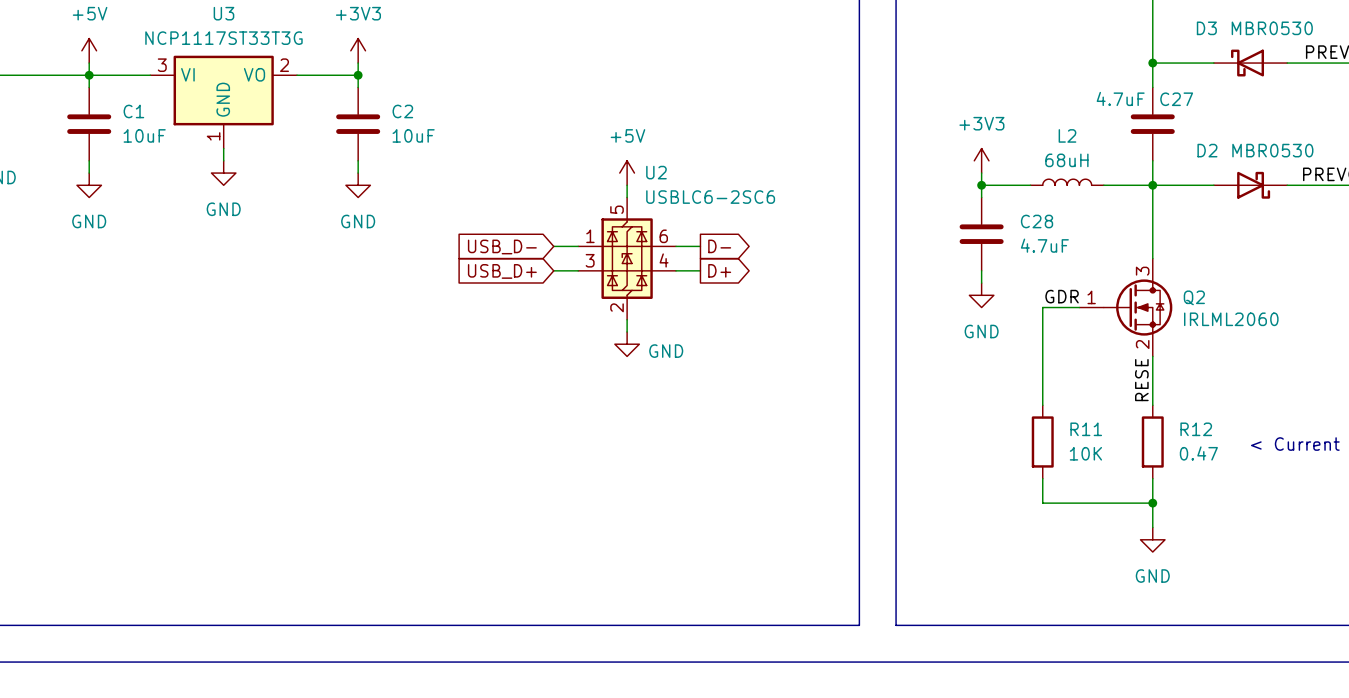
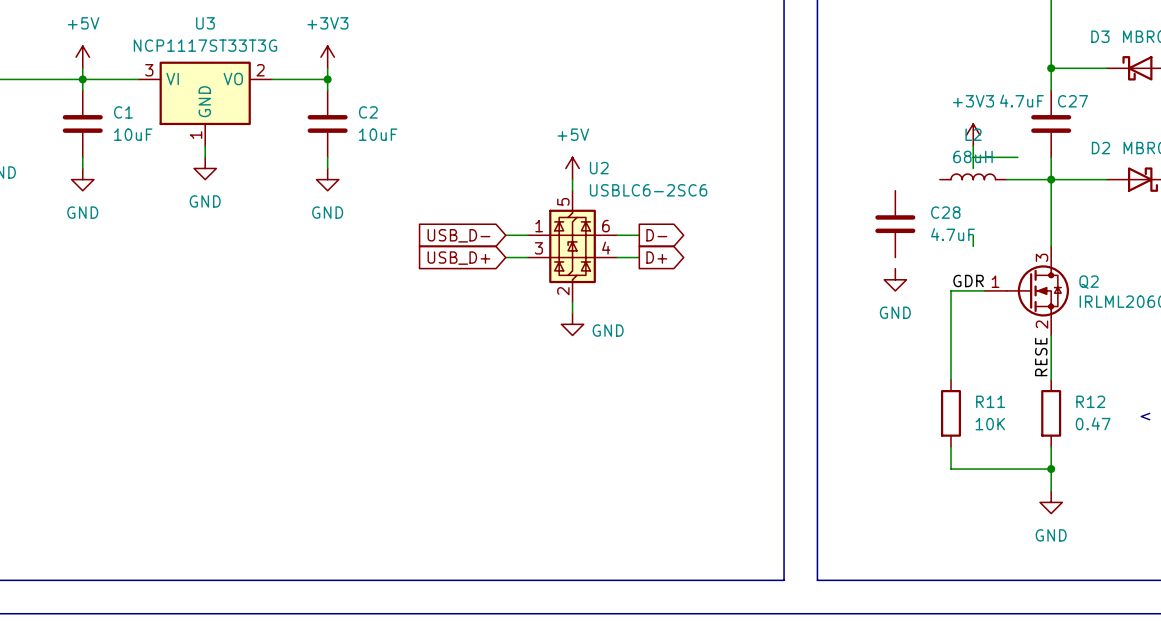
power symbol position: +3V3 (981, 160) -> +3V3 (973, 135)
wire: (981, 173) (981, 197) -> (973, 146) (973, 168)
wire: (981, 185) (1030, 185) -> (973, 157) (1017, 157)
junction: (981, 185) -> none
wire: (981, 270) (981, 283) -> (973, 235) (973, 246)

